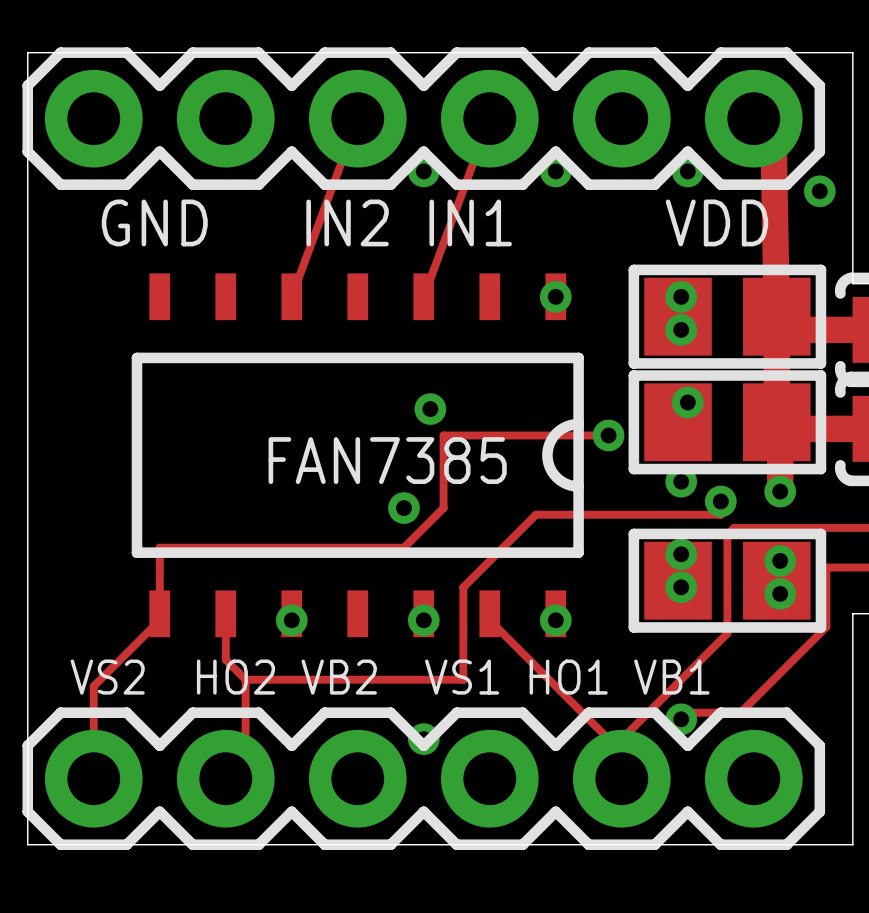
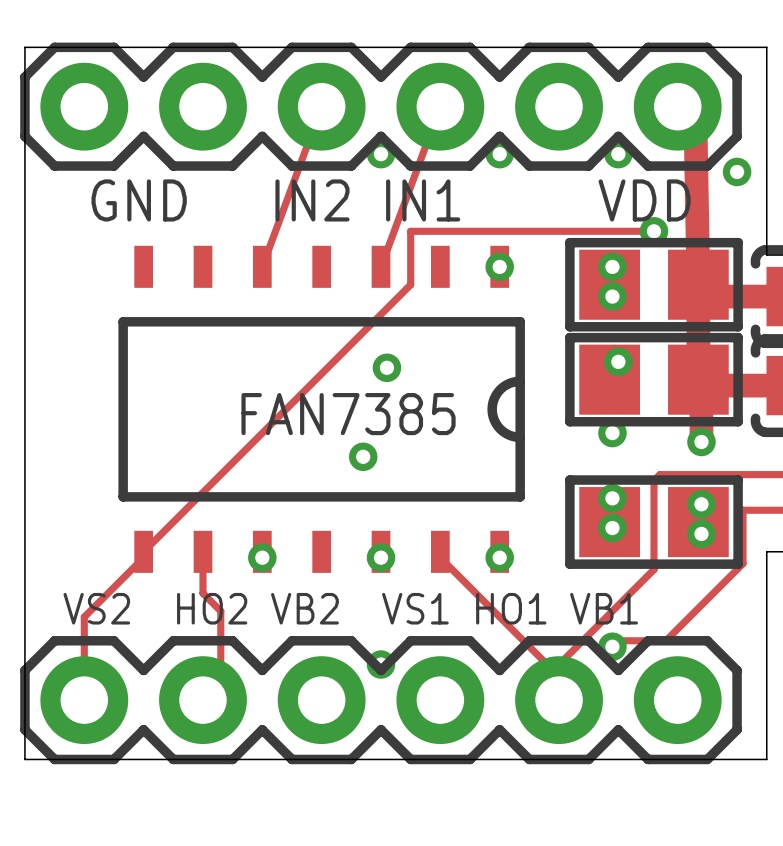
via: none -> (653, 231)
track: (608, 435) (443, 435) (443, 508) (403, 547) (159, 547) (159, 613) -> (653, 231) (410, 231) (410, 284) (143, 551)
via: (608, 435) -> none
track: (720, 501) (720, 514) (536, 514) (463, 587) (463, 679) (245, 679) -> none
via: (720, 501) -> none

